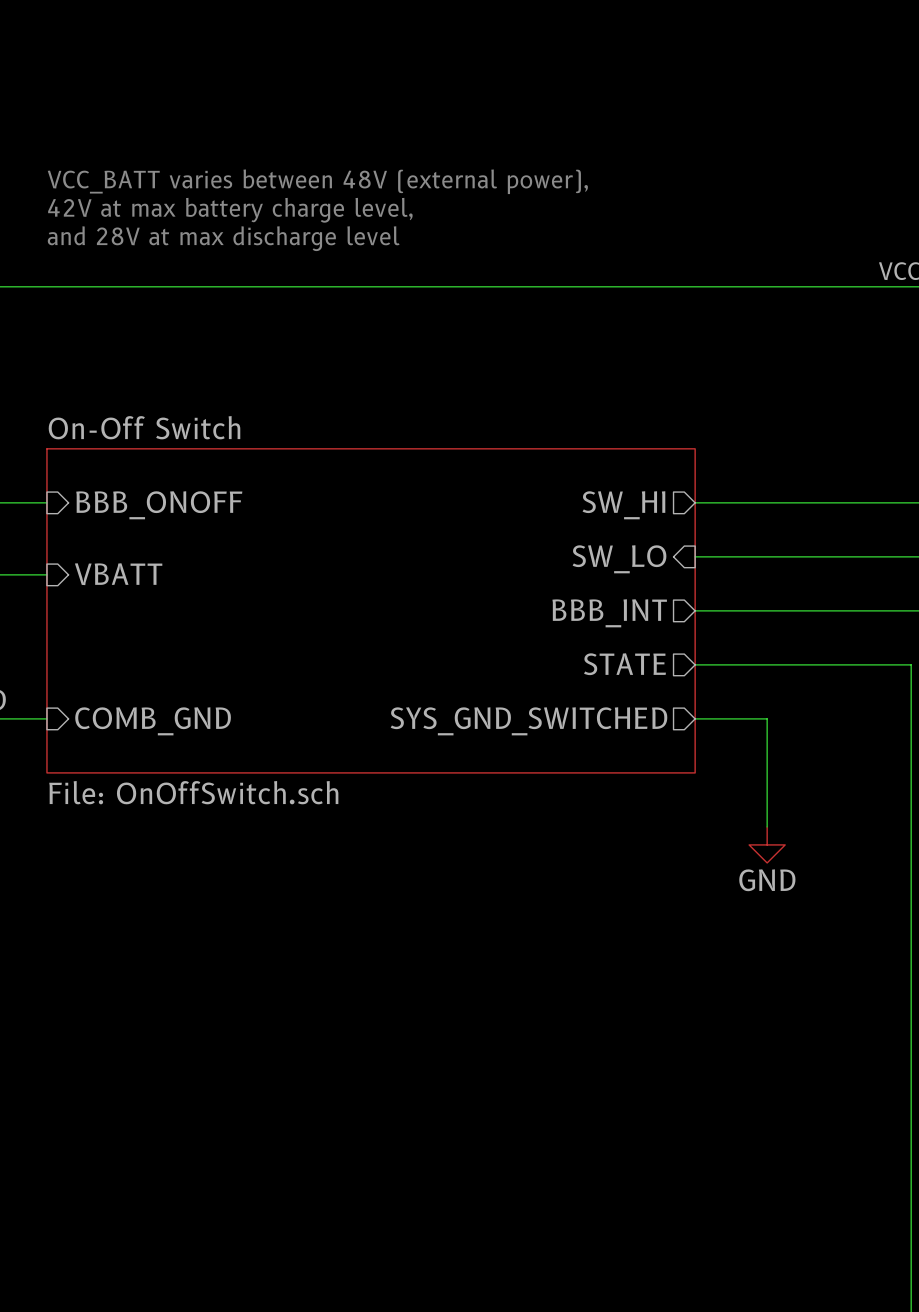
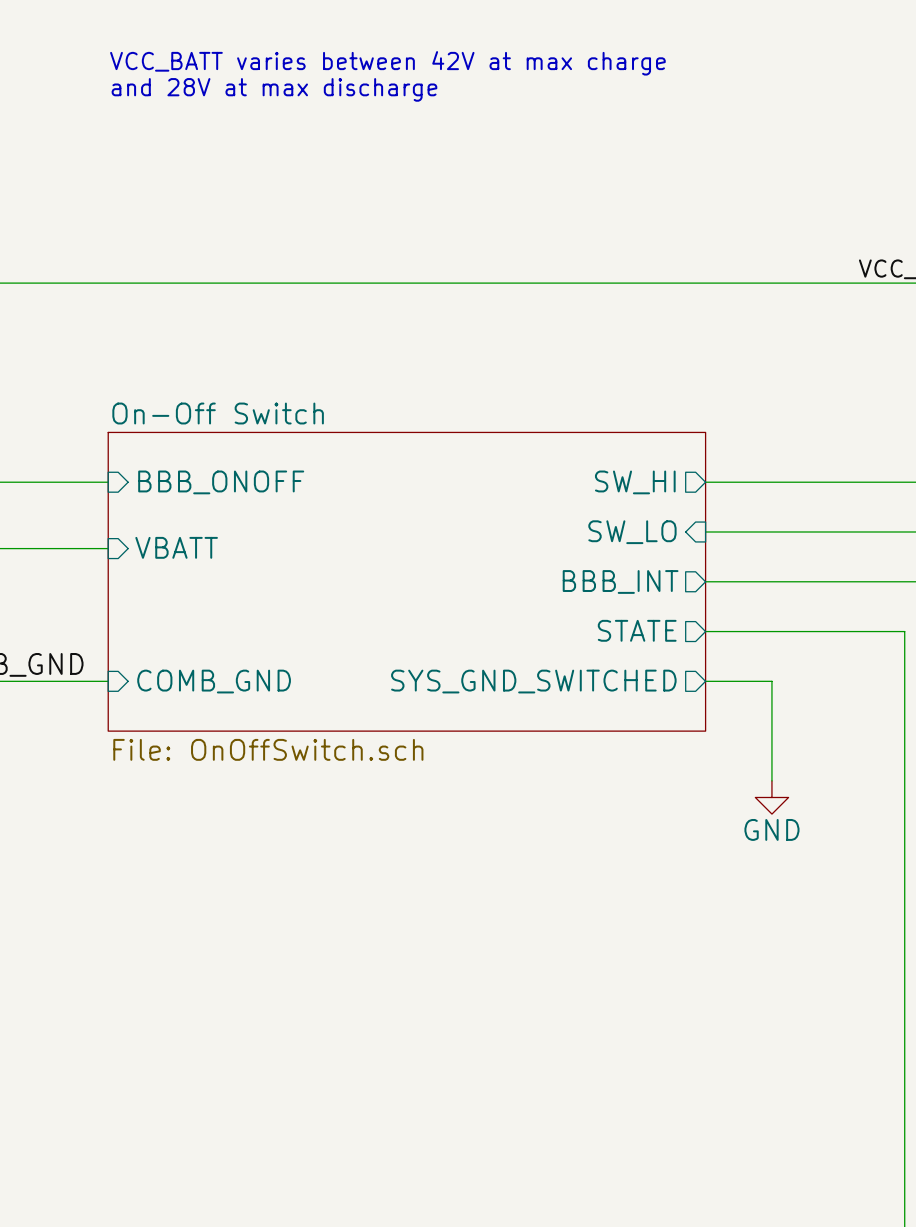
text: none -> VCC_BATT varies between 42V at max charge (387, 63)
text: none -> and 28V at max discharge (274, 89)
text: VCC_BATT varies between 48V (external power), (317, 181) -> none
text: 42V at max battery charge level, (230, 210) -> none
text: and 28V at max discharge level (223, 238) -> none

